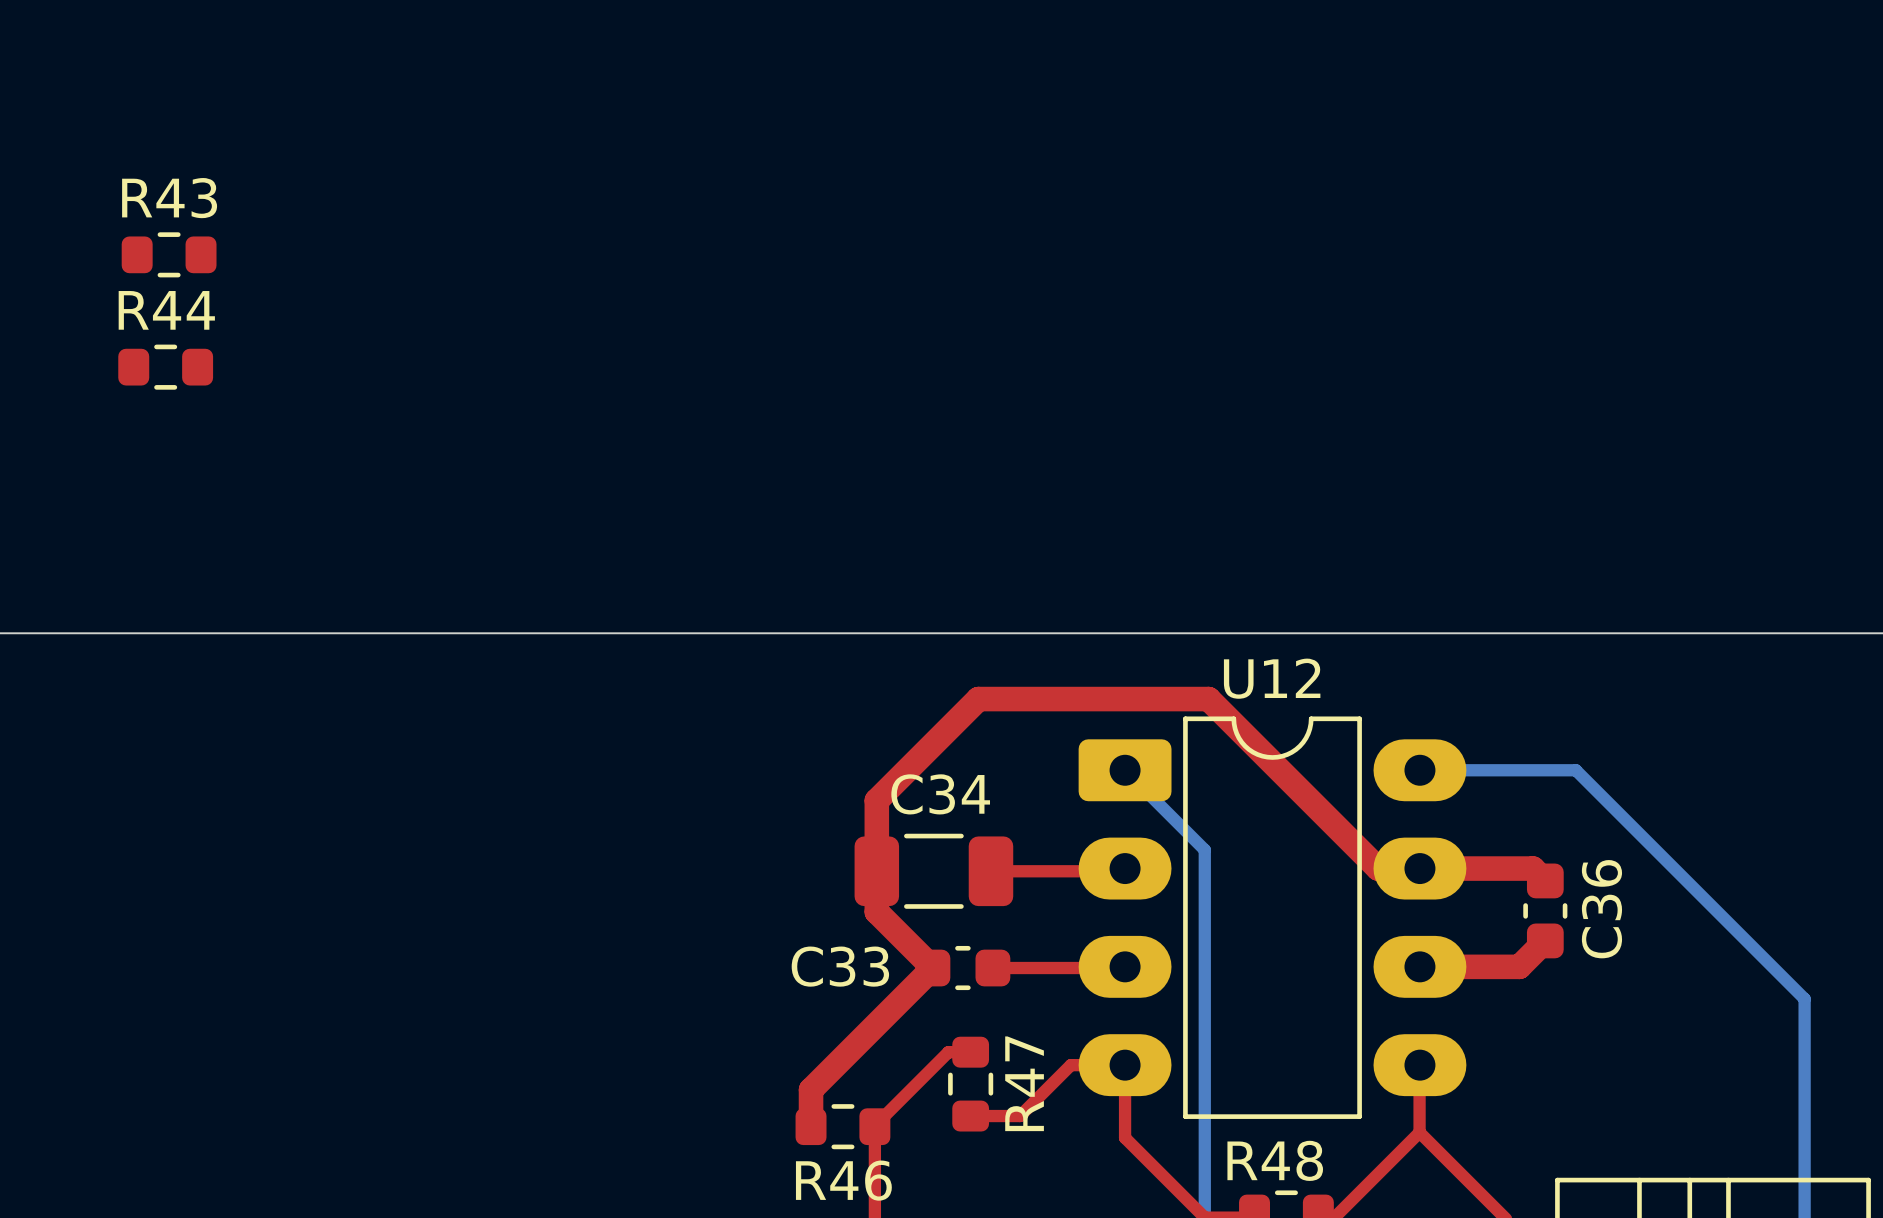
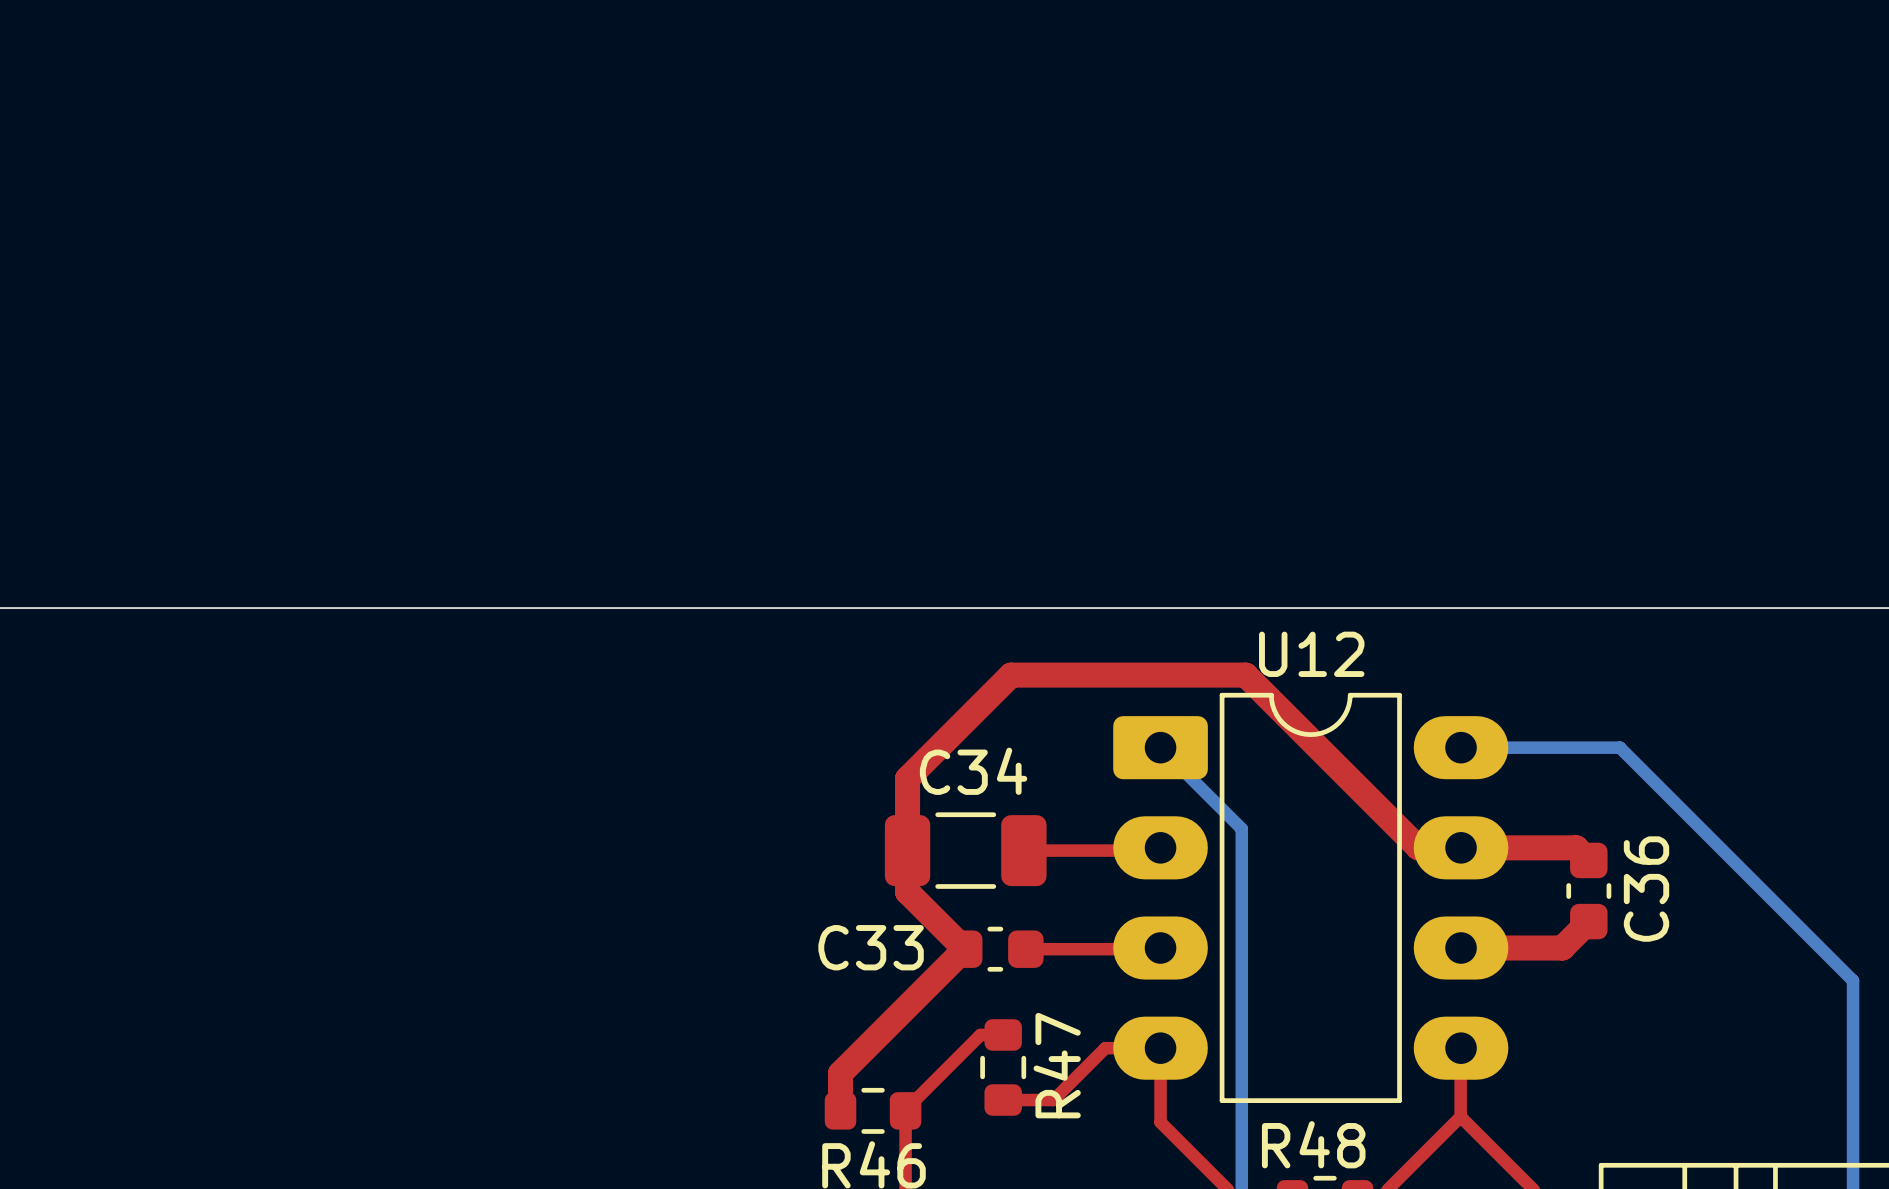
R43: (169, 254) -> none
R44: (165, 367) -> none

